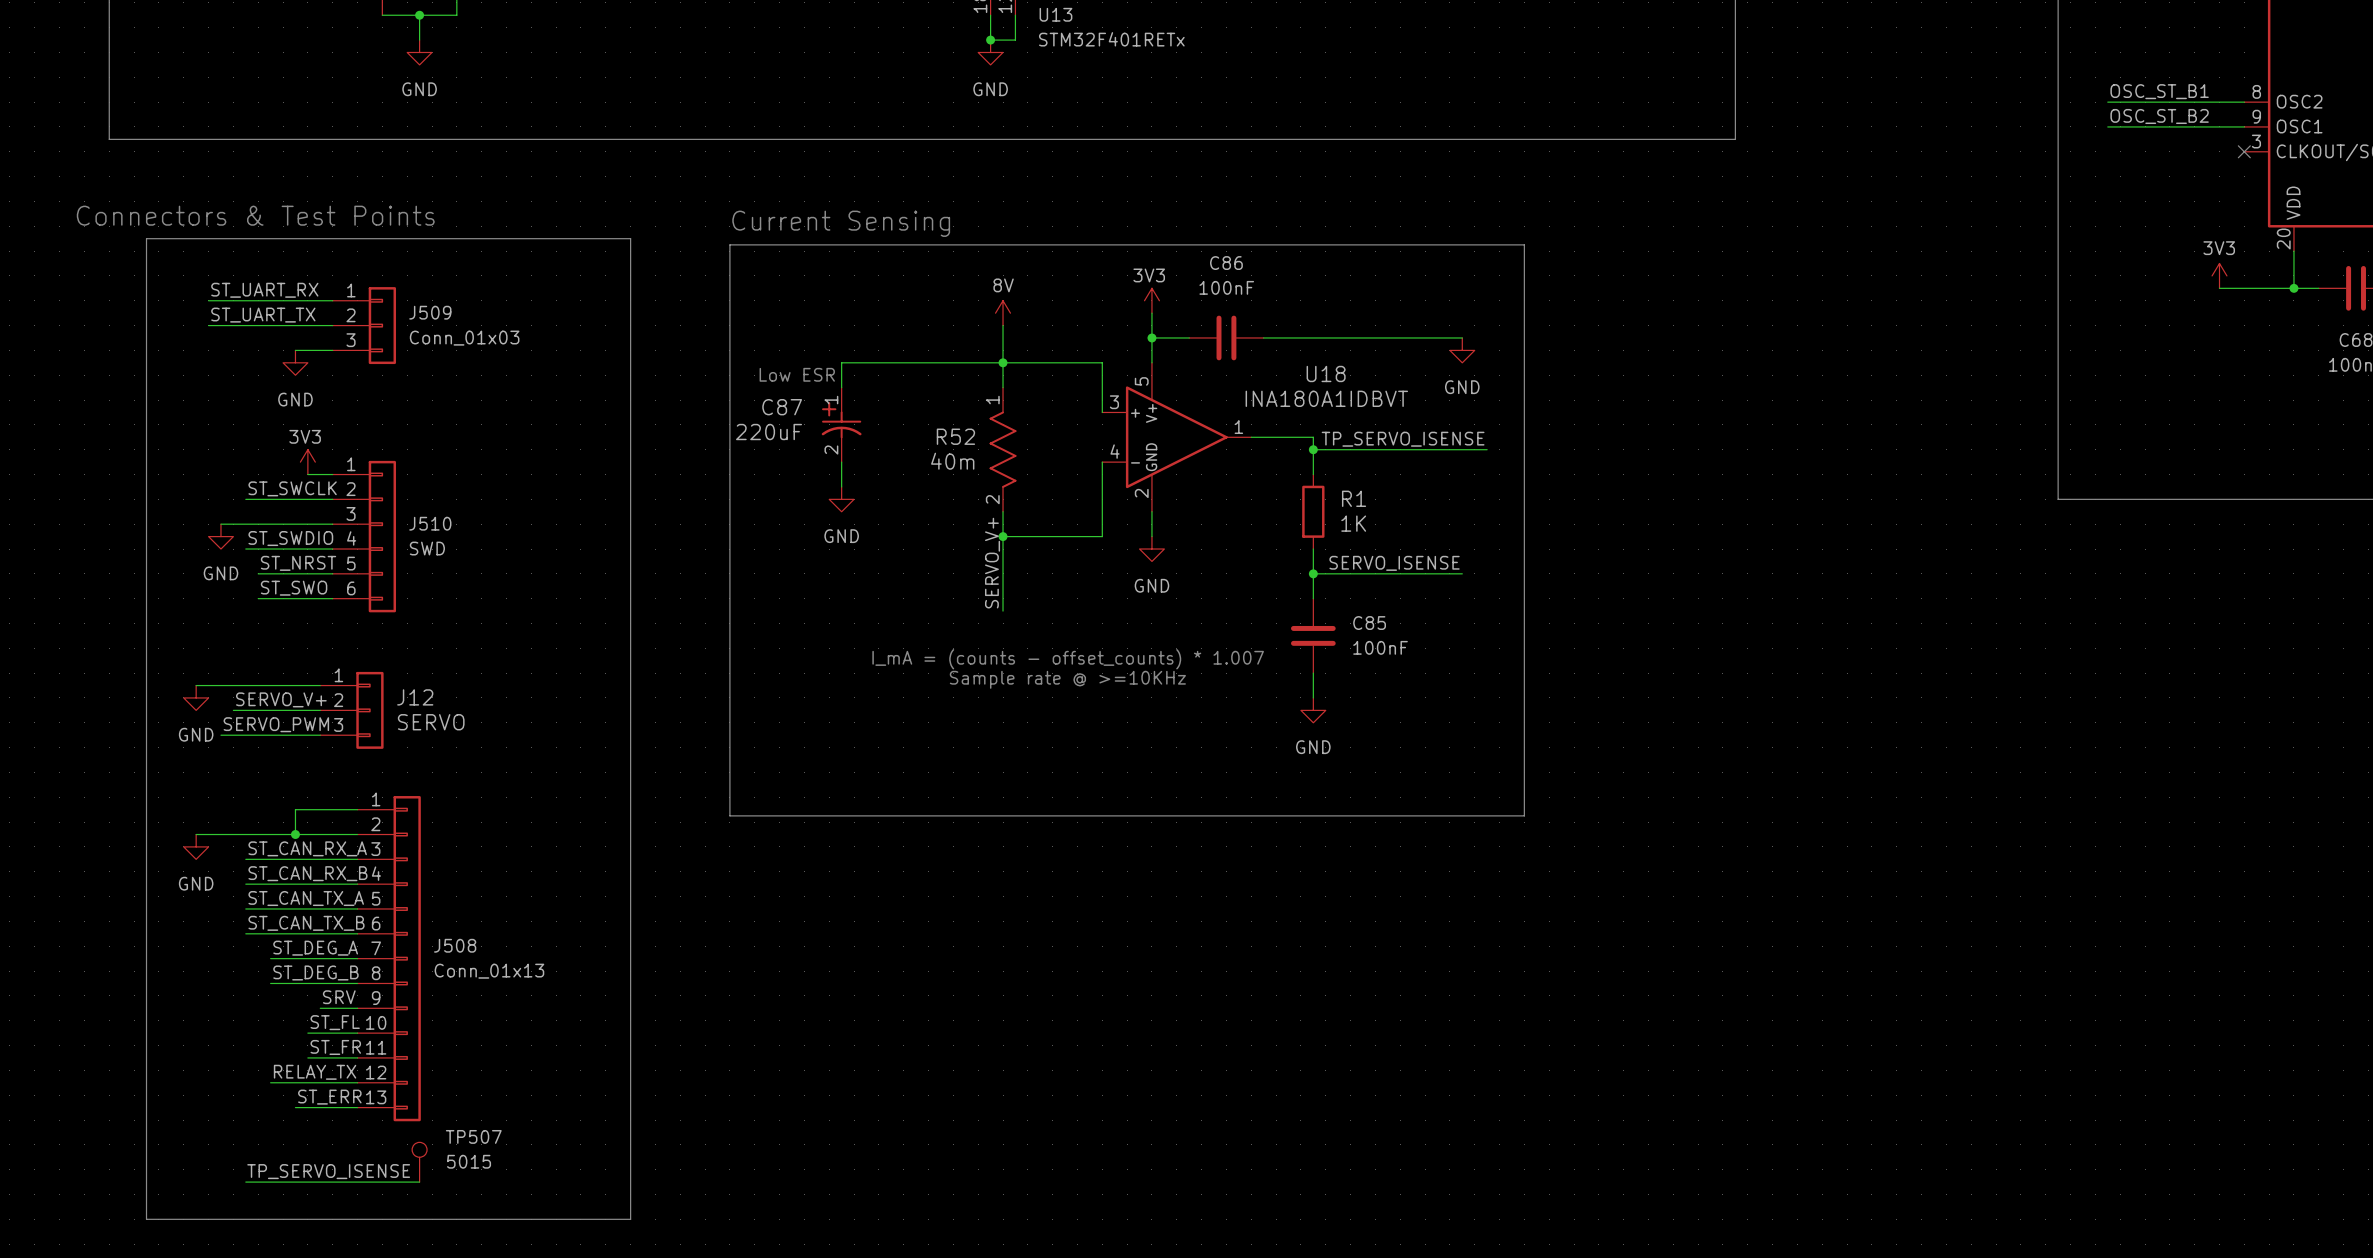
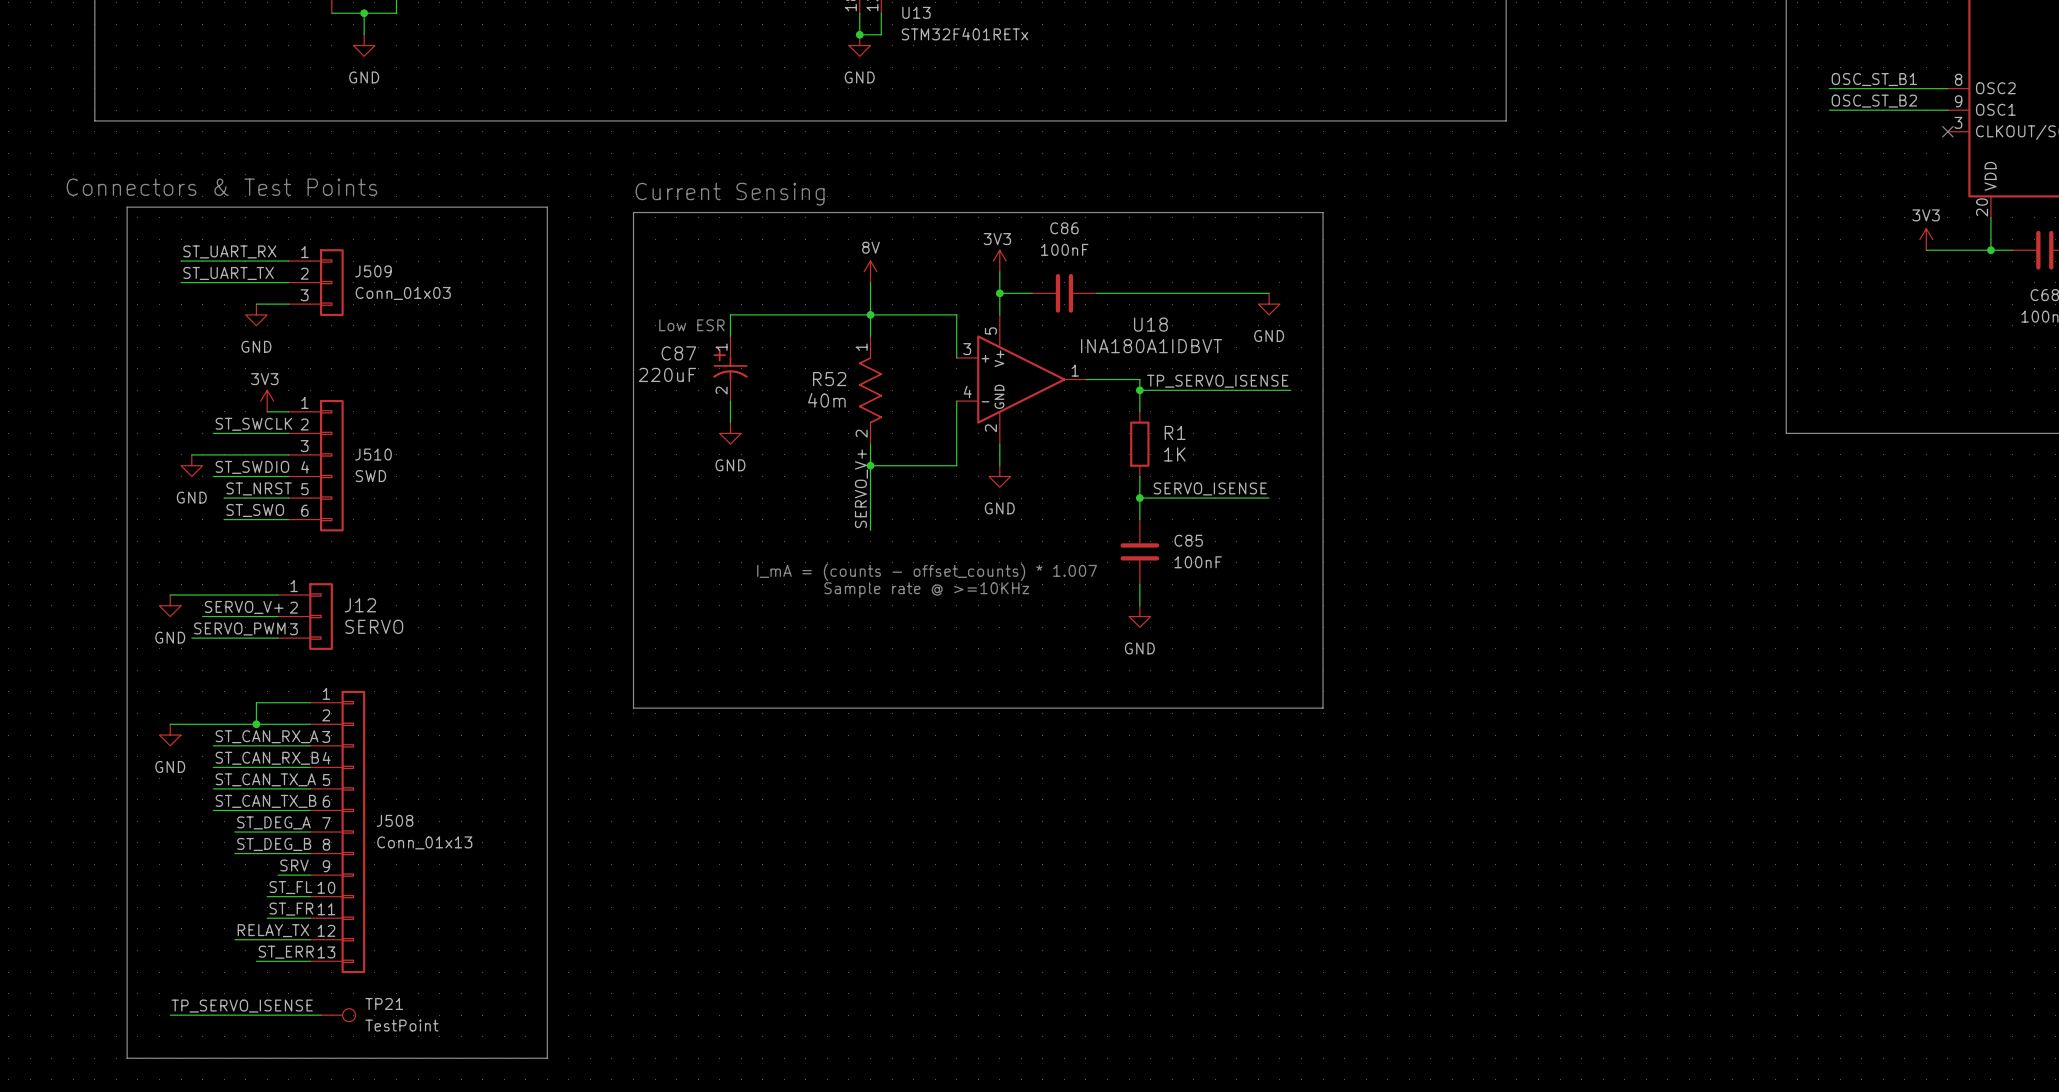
TP507: 5015 (419, 1162) -> none
TP21: none -> TestPoint (338, 1015)
label position: TP_SERVO_ISENSE (328, 1171) -> TP_SERVO_ISENSE (242, 1006)
wire: (245, 1182) (419, 1182) -> (170, 1015) (321, 1015)

